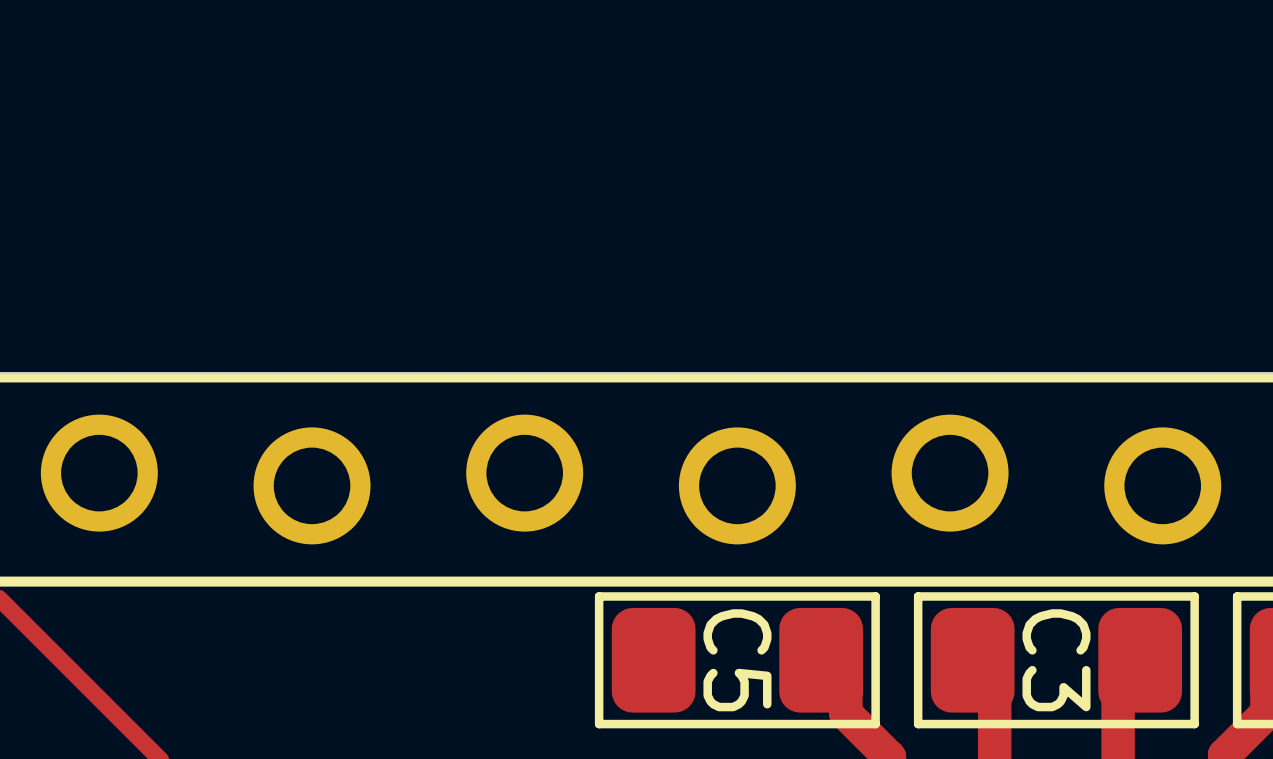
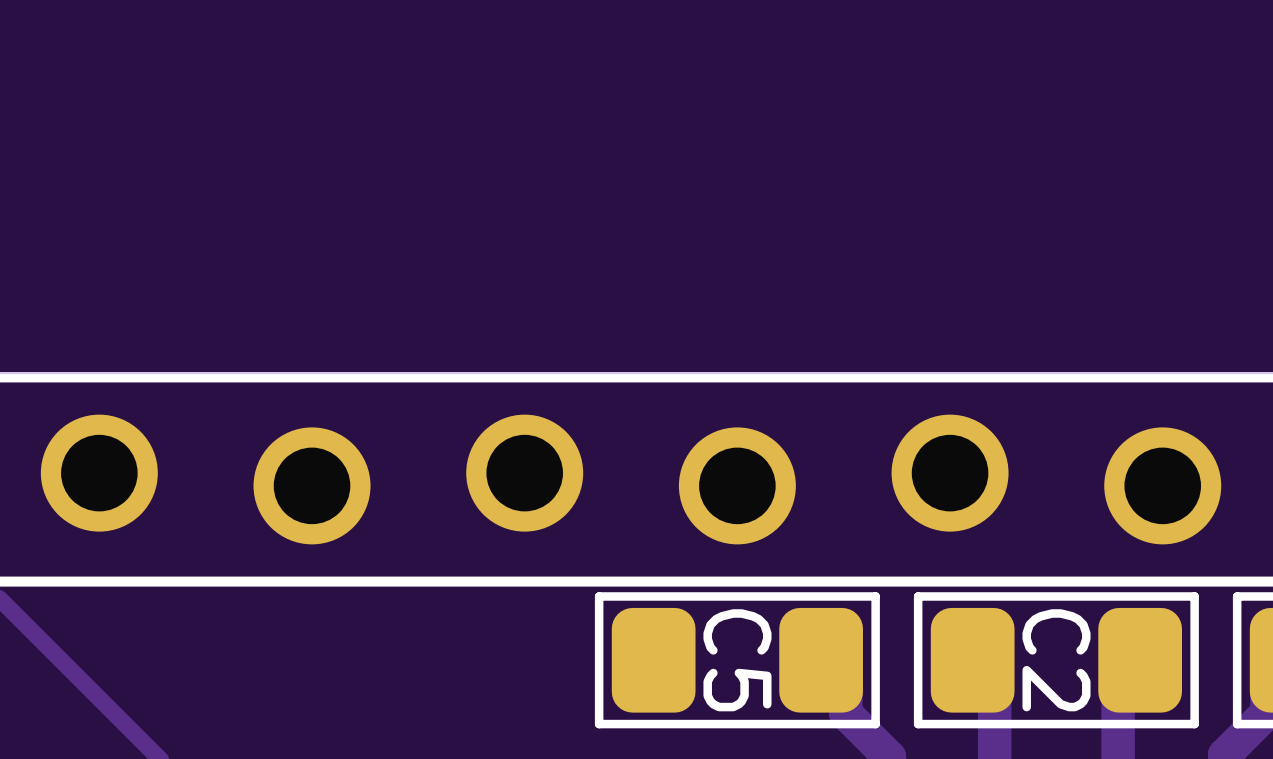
C3 name: C3 (1056, 660) -> C2 (1056, 660)

